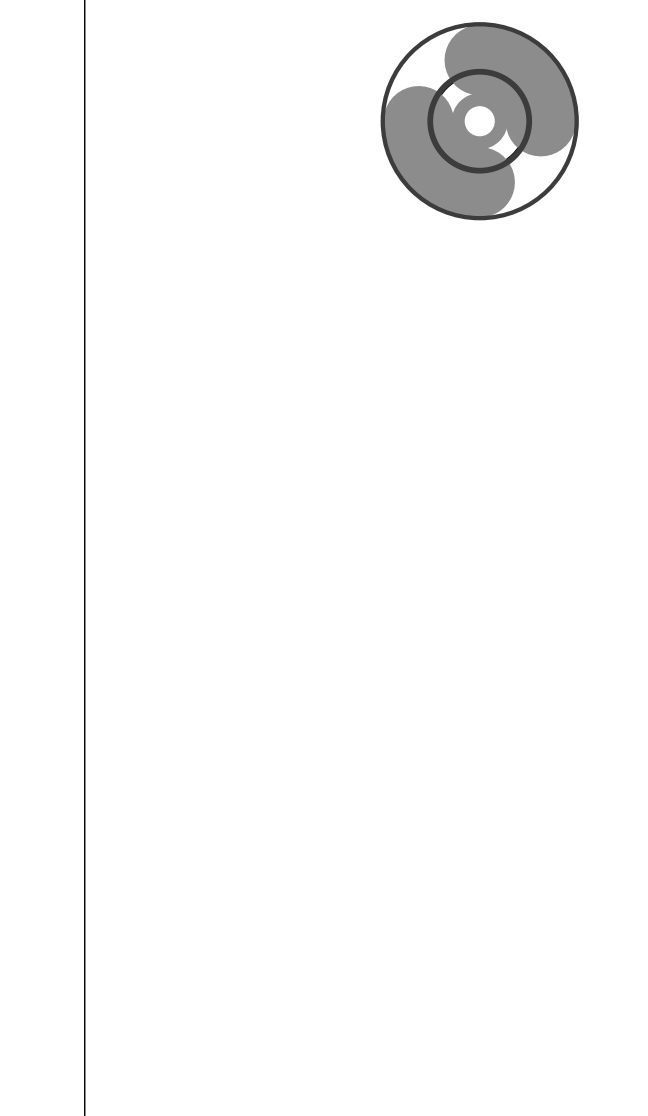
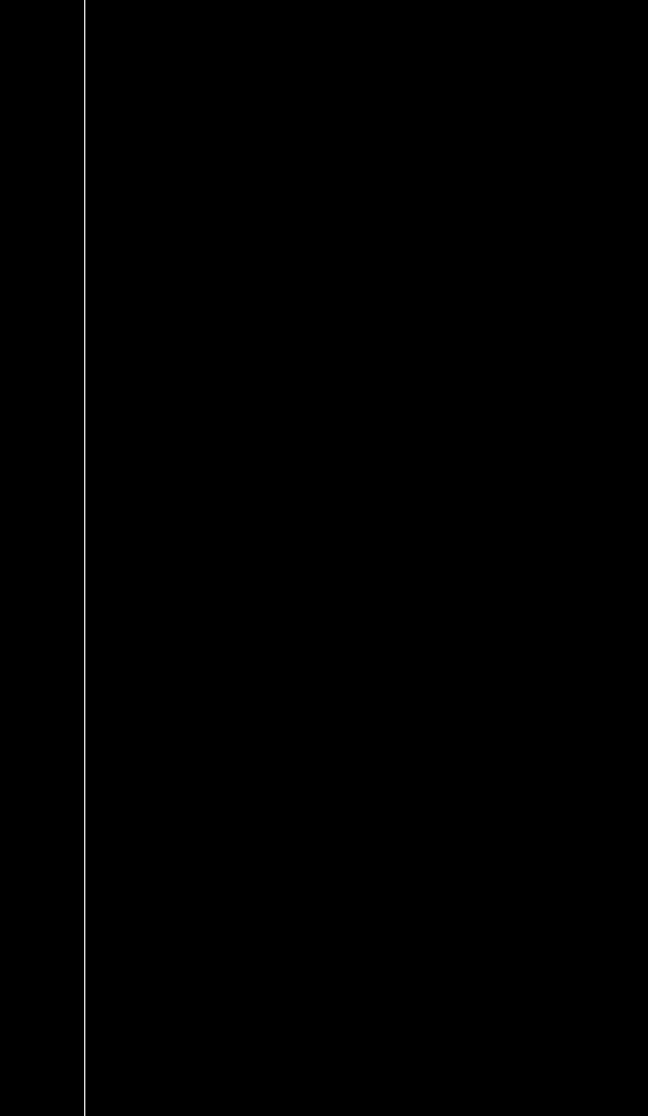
part: (479, 121) -> none

